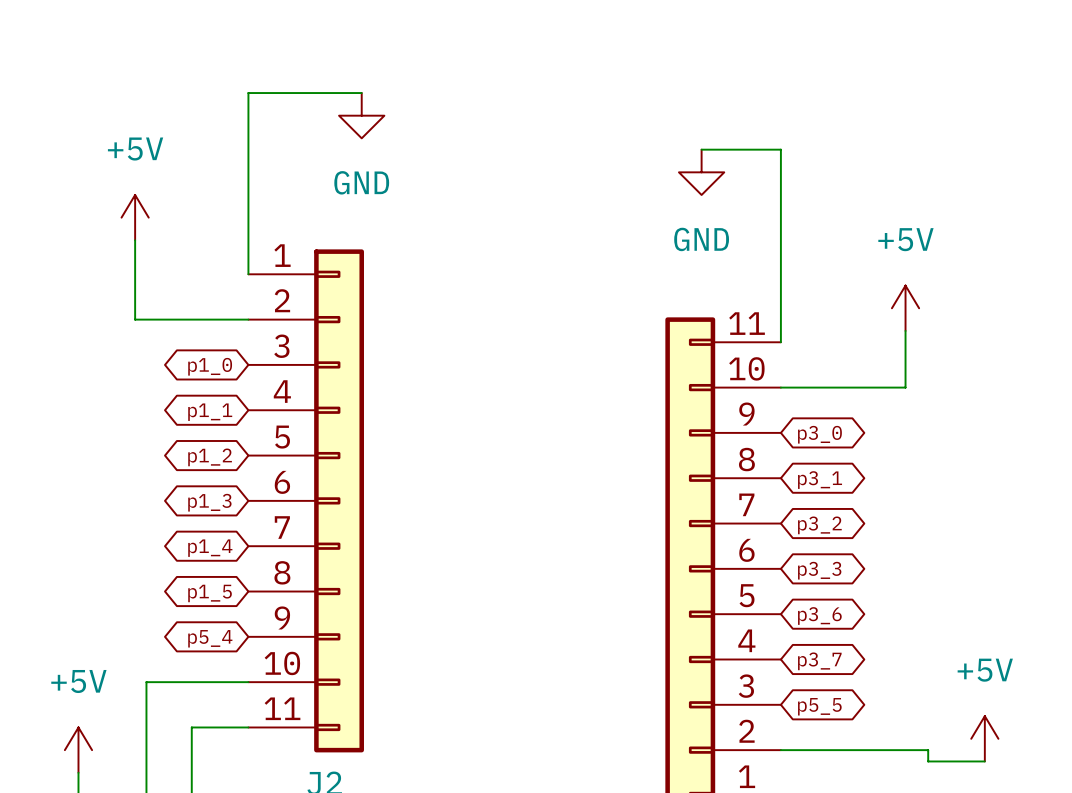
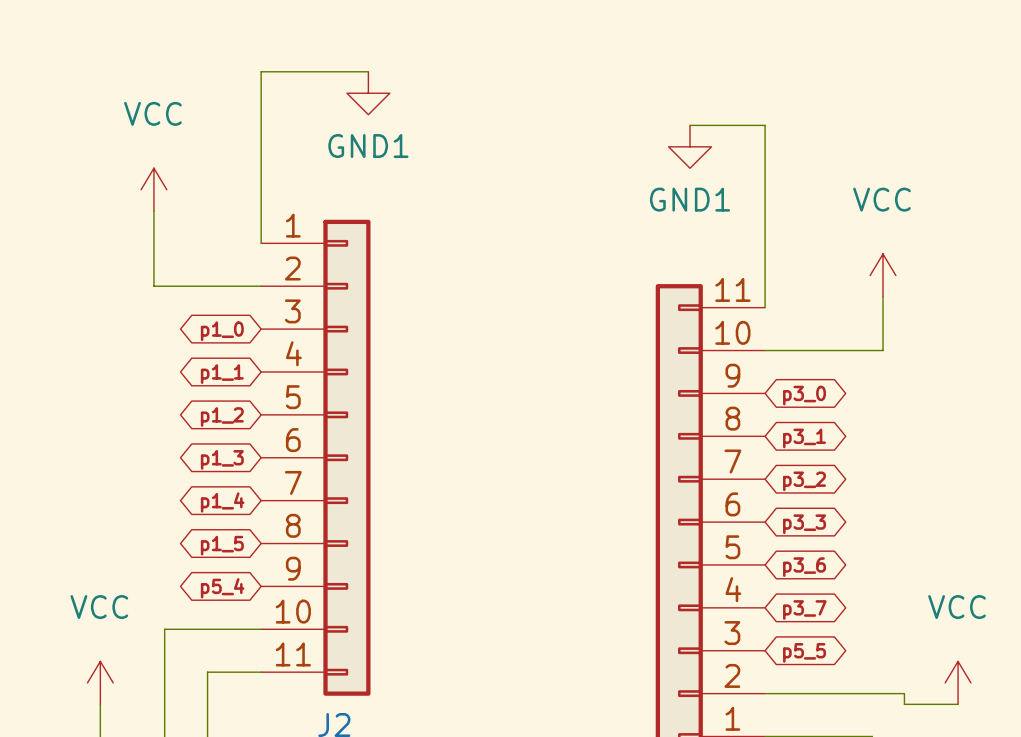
power symbol: GND (361, 115) -> GND1 (368, 93)
power symbol: GND (701, 172) -> GND1 (690, 146)
power symbol: +5V (135, 217) -> VCC (153, 189)
power symbol: +5V (905, 308) -> VCC (883, 275)
power symbol: +5V (984, 738) -> VCC (958, 682)
power symbol: +5V (78, 750) -> VCC (100, 682)

